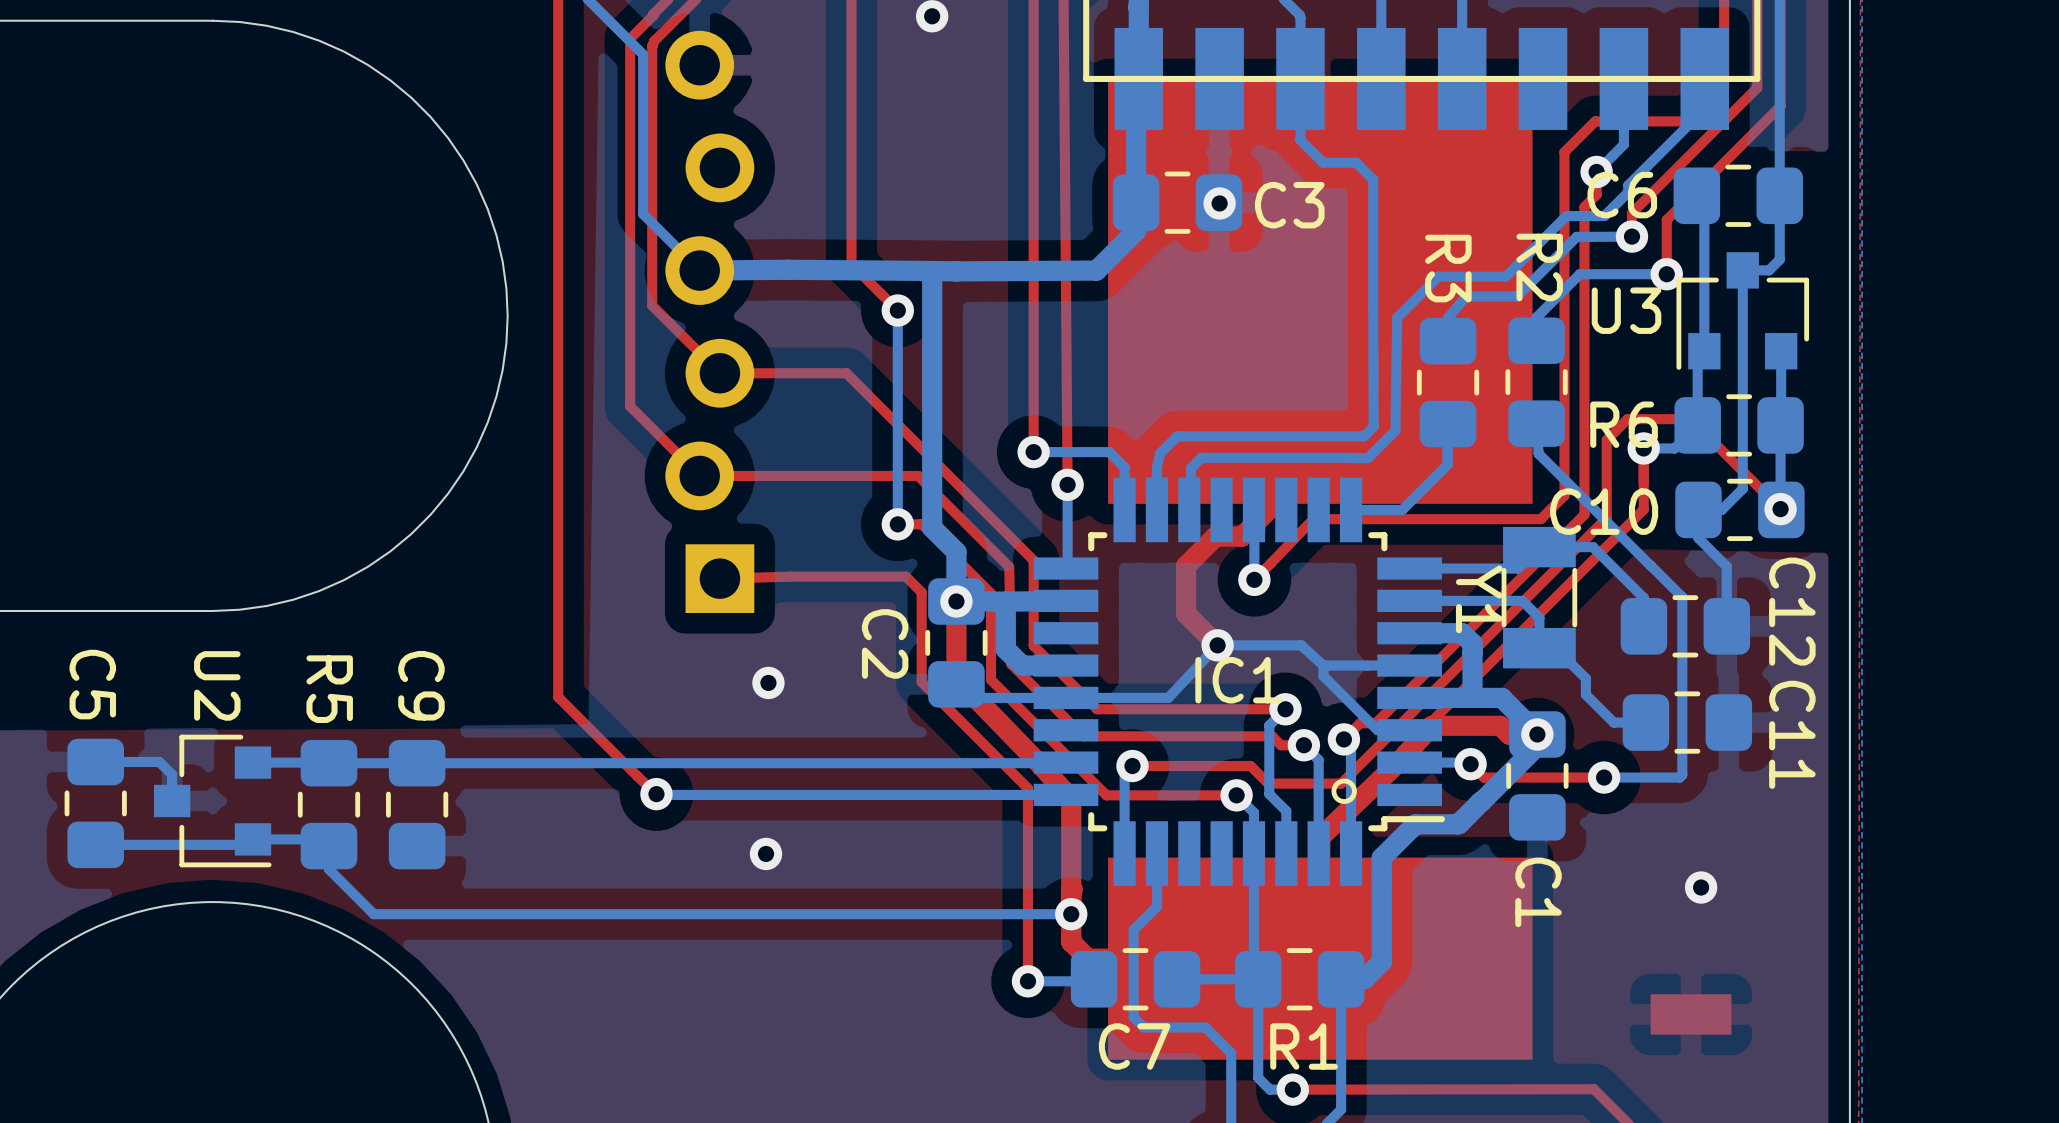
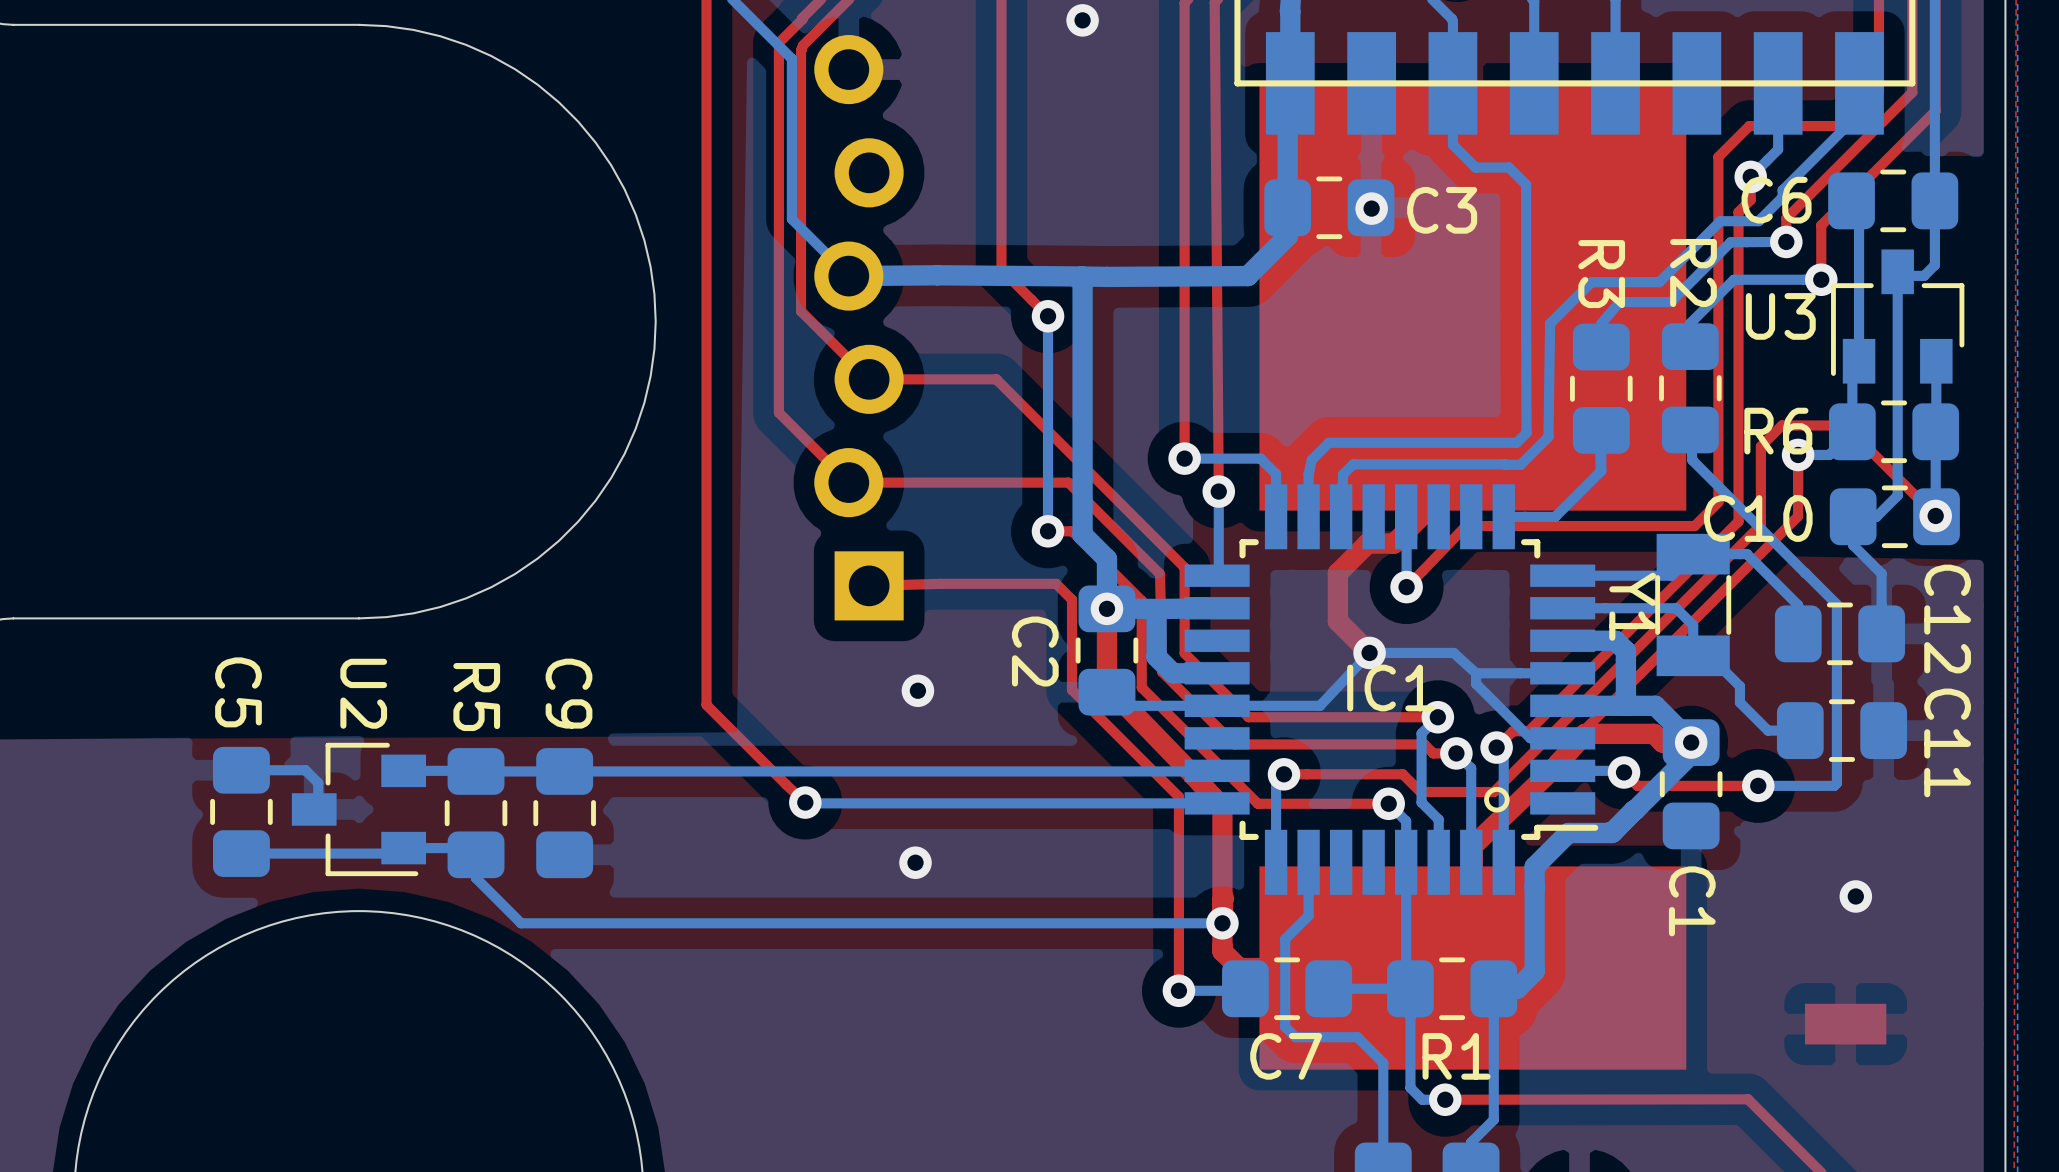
U3 footprint: [1676, 252, 1810, 370] -> [1831, 249, 1965, 384]
U2 footprint: [153, 734, 272, 868] -> [291, 742, 427, 877]

